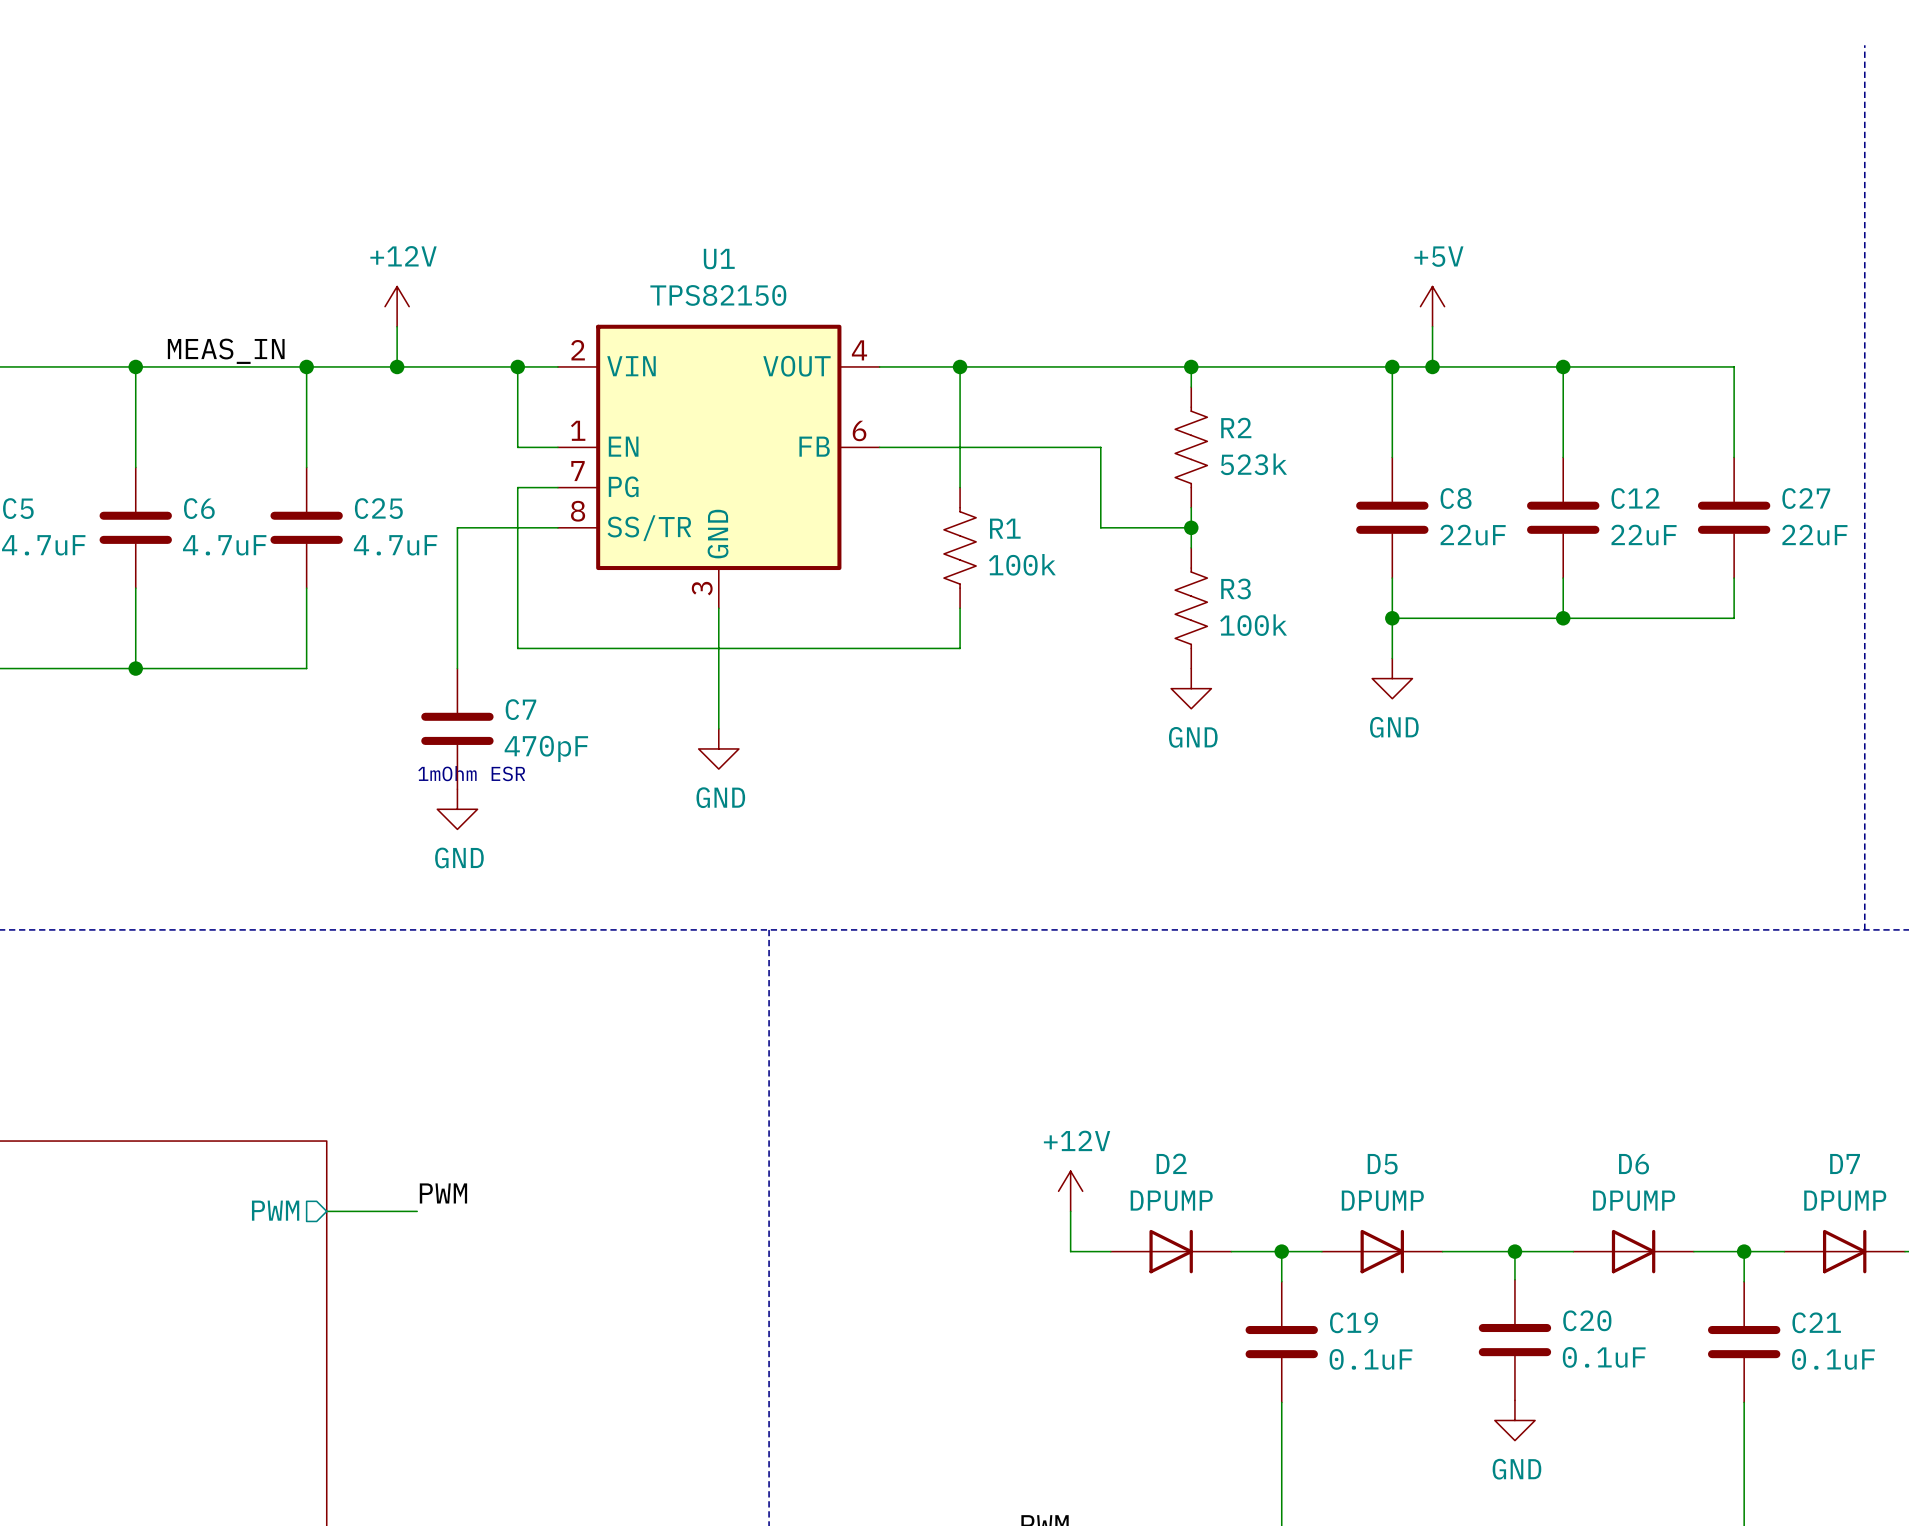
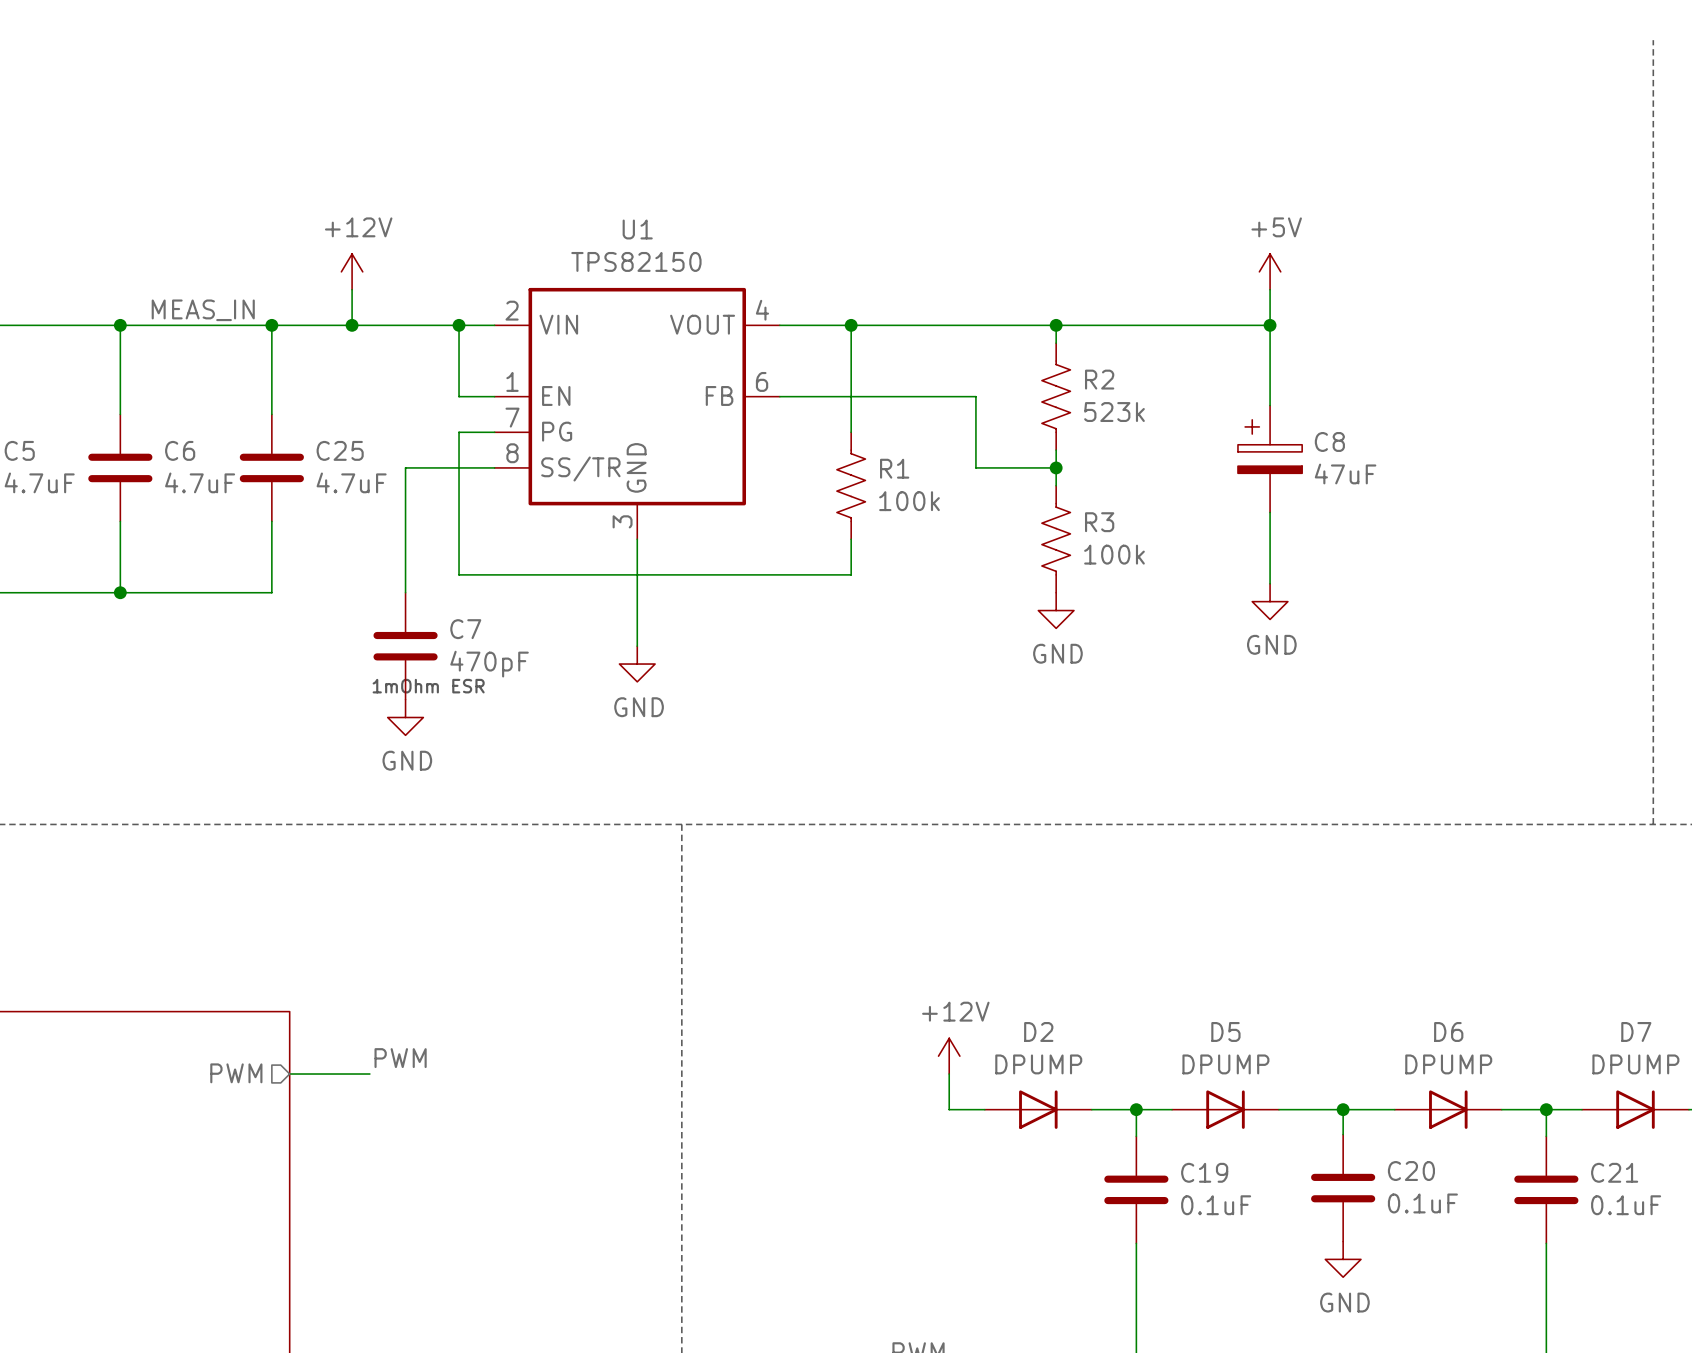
wire: (1392, 366) (1392, 457) -> none
junction: (1392, 366) -> none
wire: (1432, 366) (1734, 366) (1734, 457) -> (1270, 325) (1270, 405)
wire: (1563, 366) (1563, 457) -> none
junction: (1563, 366) -> none
C8 symbol: [1356, 457, 1429, 579] -> [1237, 405, 1303, 513]
C12: 22uF (1563, 517) -> none
C27: 22uF (1734, 517) -> none
C8 value: 22uF (1473, 535) -> 47uF (1345, 473)
wire: (1392, 578) (1392, 658) -> (1270, 512) (1270, 583)
wire: (1563, 578) (1563, 618) -> none
wire: (1734, 578) (1734, 618) (1392, 618) -> none
junction: (1392, 618) -> none
junction: (1563, 618) -> none
power symbol position: GND (1392, 678) -> GND (1270, 601)

